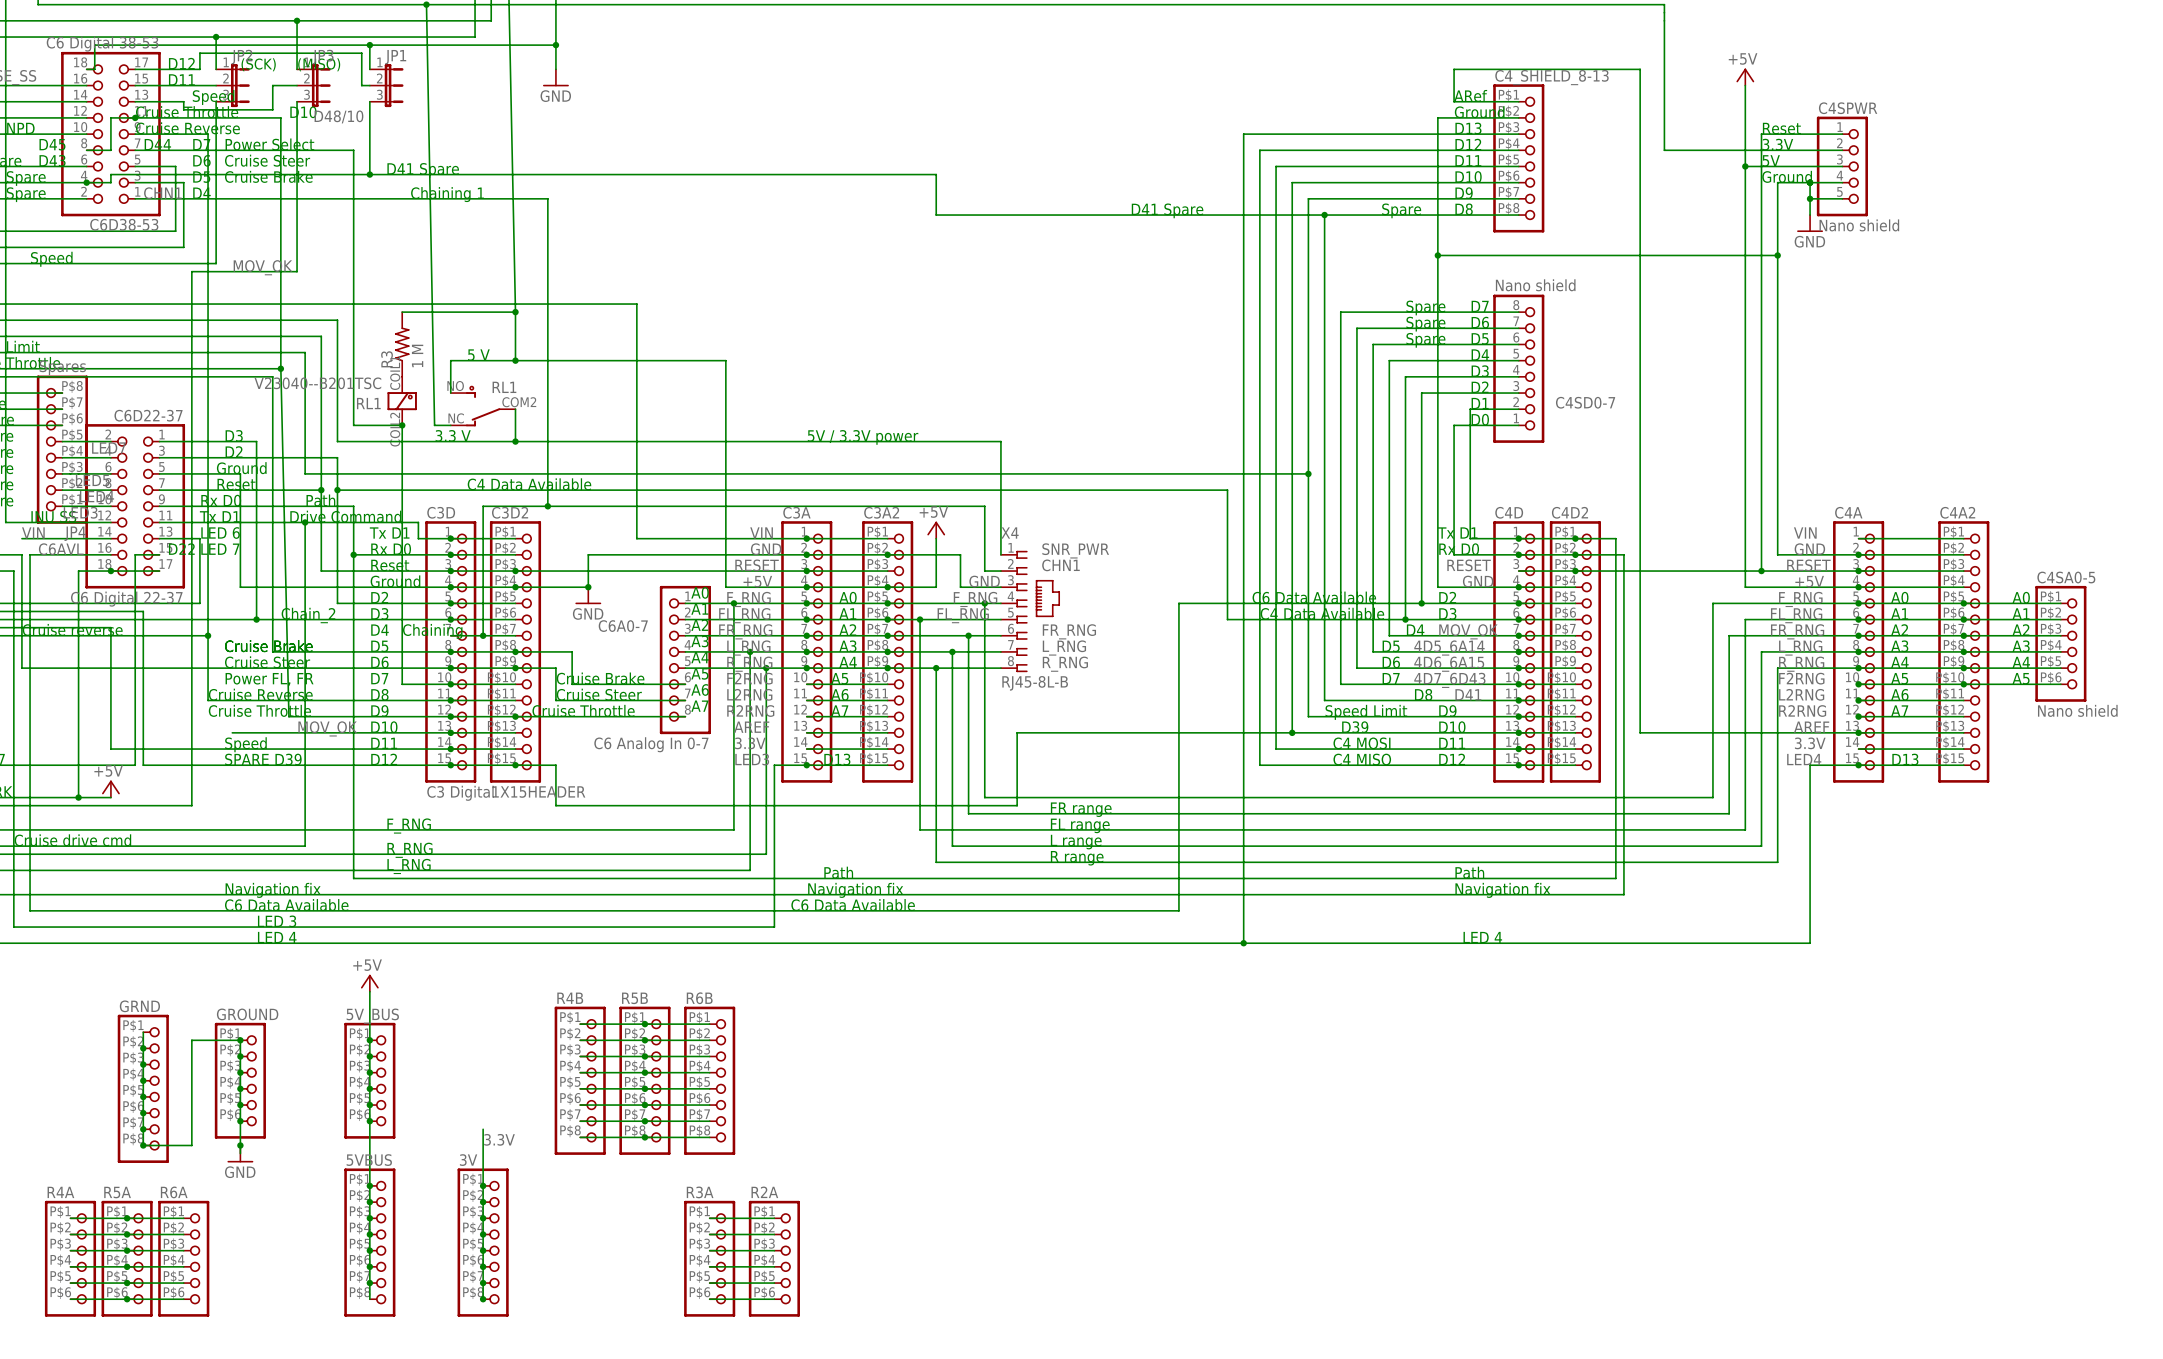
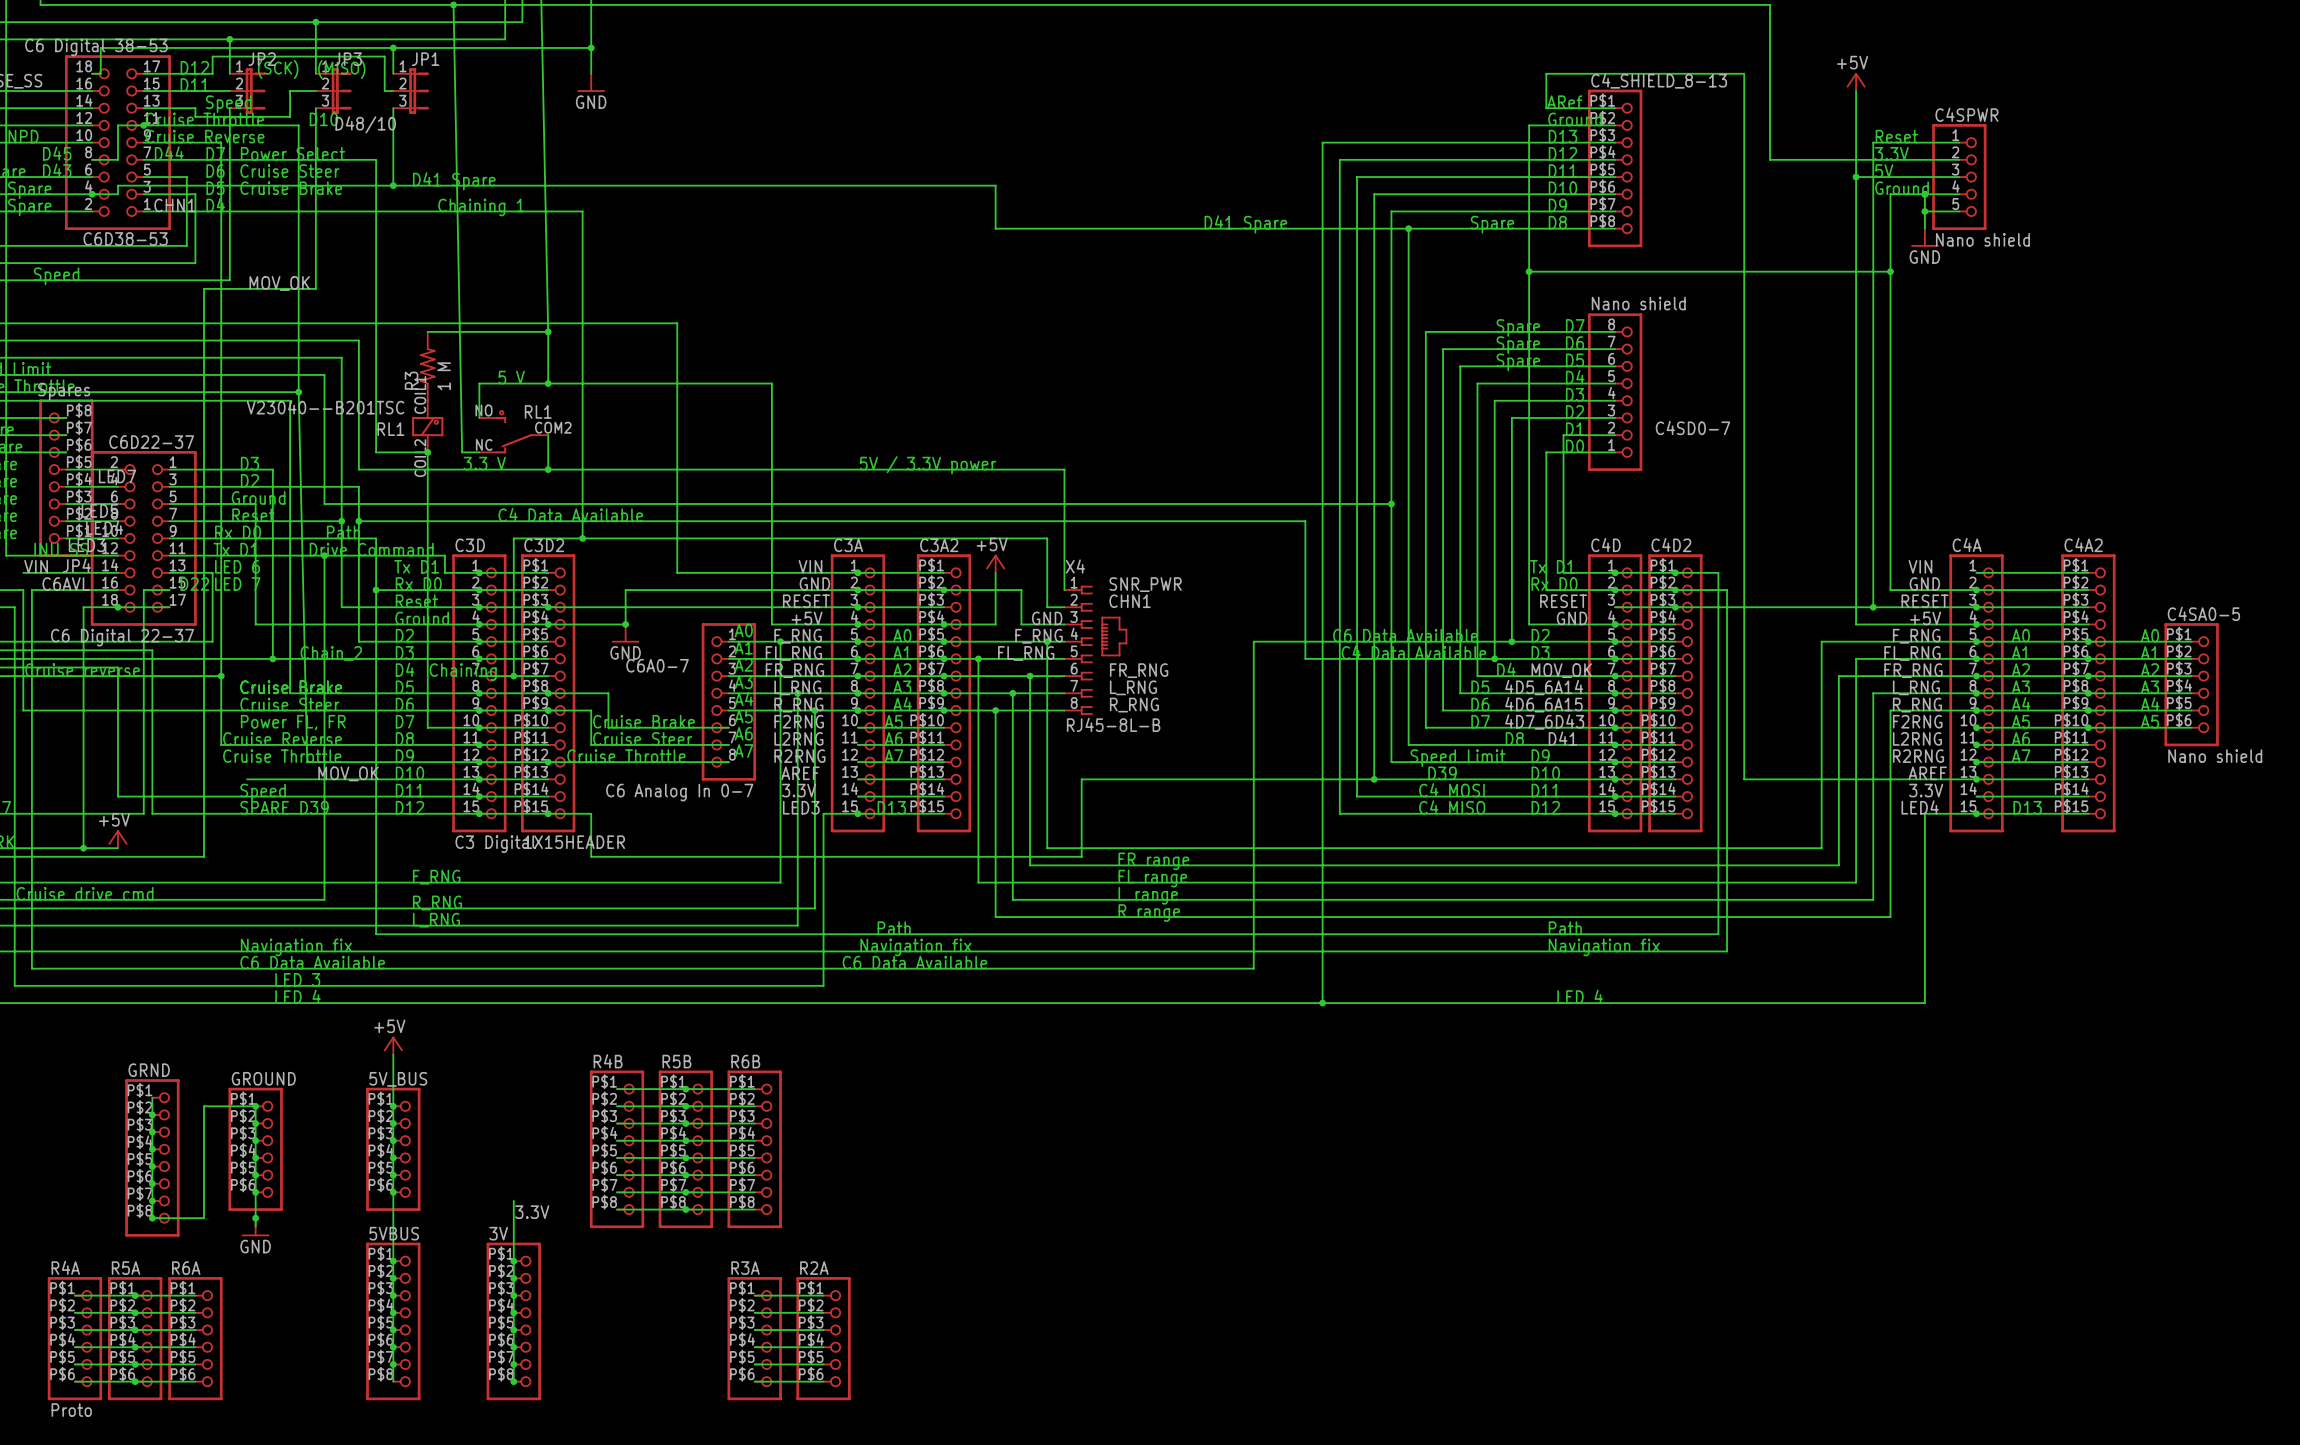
R4A value: none -> Proto (71, 1410)

